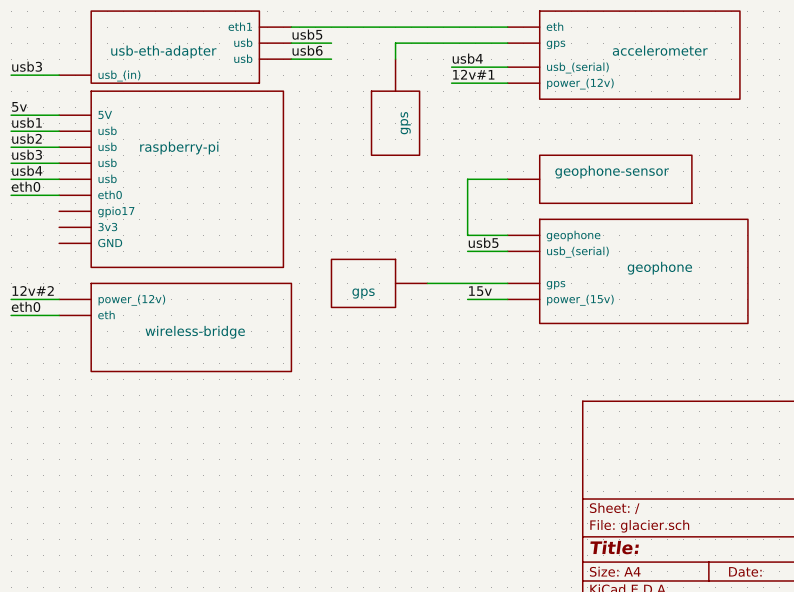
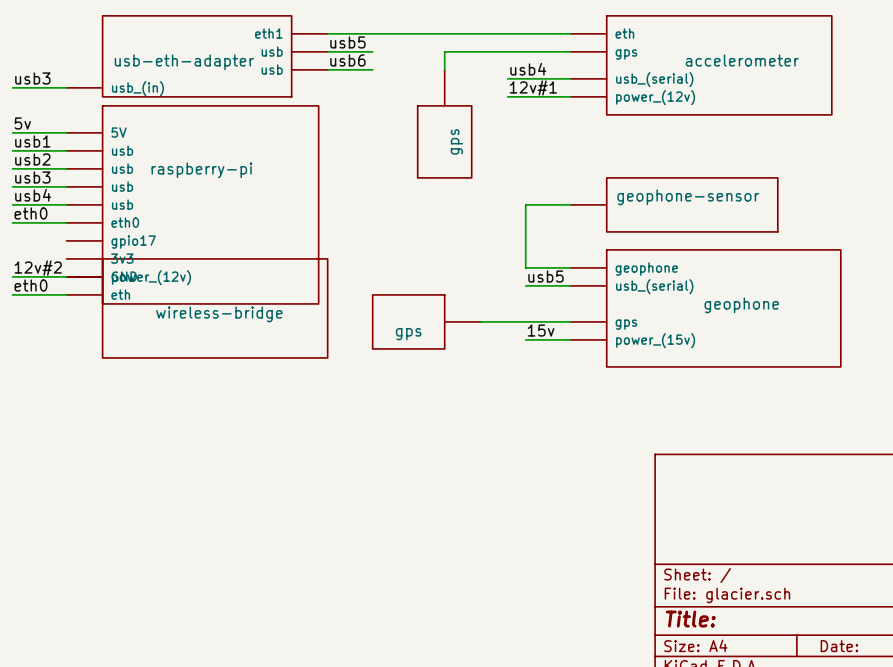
label position: 12v#2 (33, 290) -> 12v#2 (38, 268)
wire: (11, 299) (59, 299) -> (12, 276) (66, 276)
label position: eth0 (26, 306) -> eth0 (31, 285)
wire: (11, 315) (59, 315) -> (12, 294) (66, 294)
part position: (175, 327) -> (197, 308)

